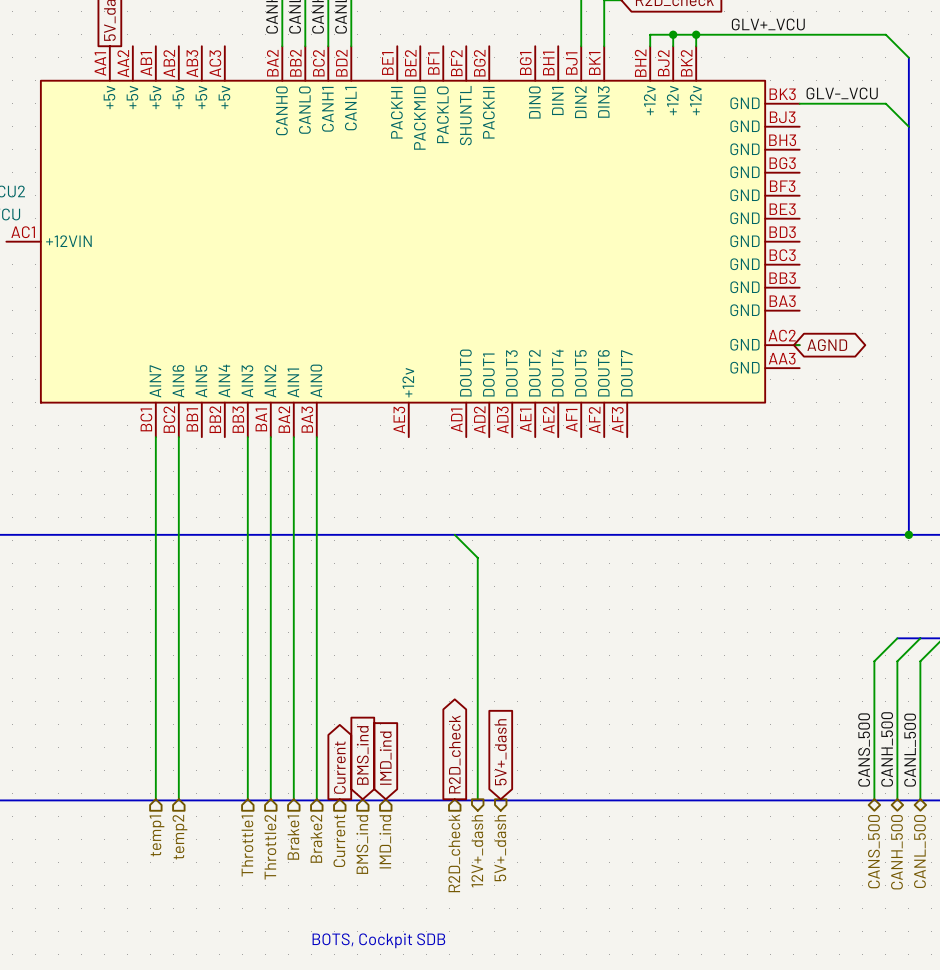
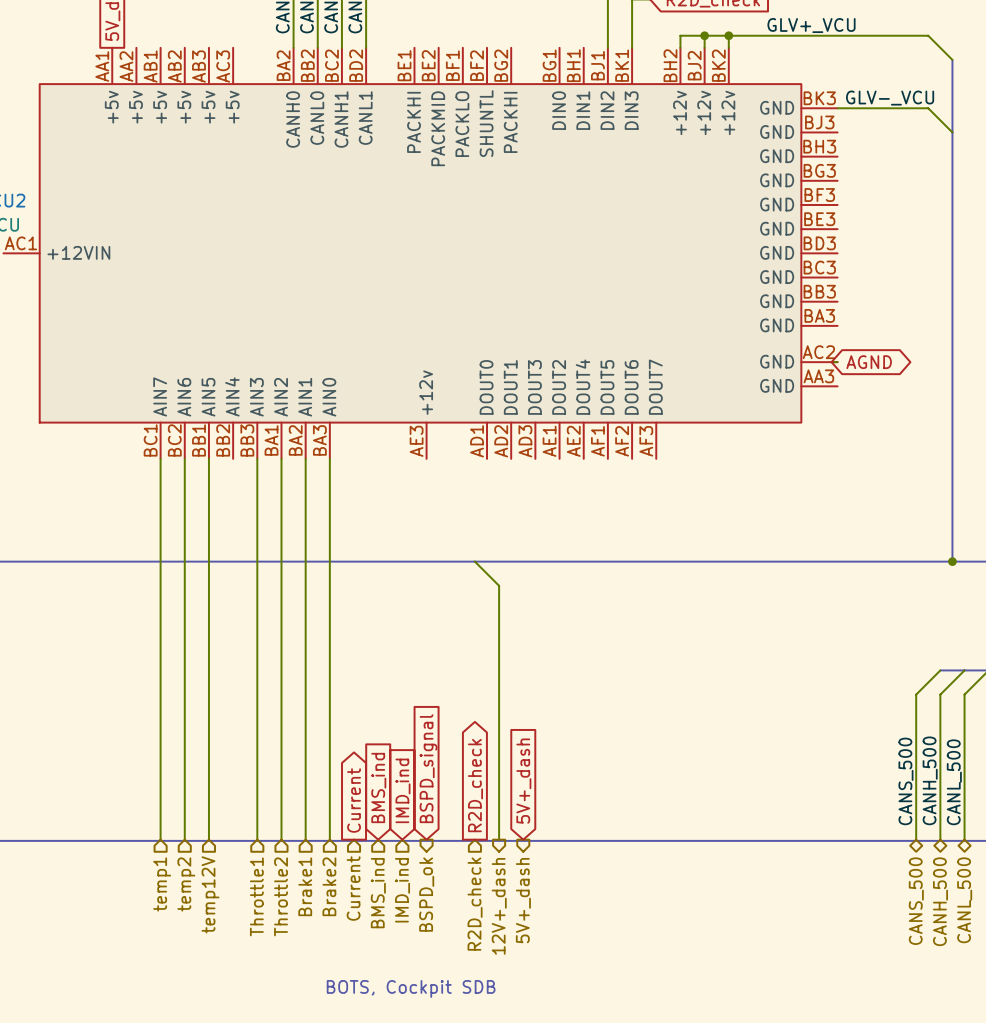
wire: none -> (208, 458) (208, 839)
global label: none -> BSPD_signal (428, 768)
hierarchical label: none -> temp12V (210, 894)
hierarchical label: none -> BSPD_ok (426, 894)

